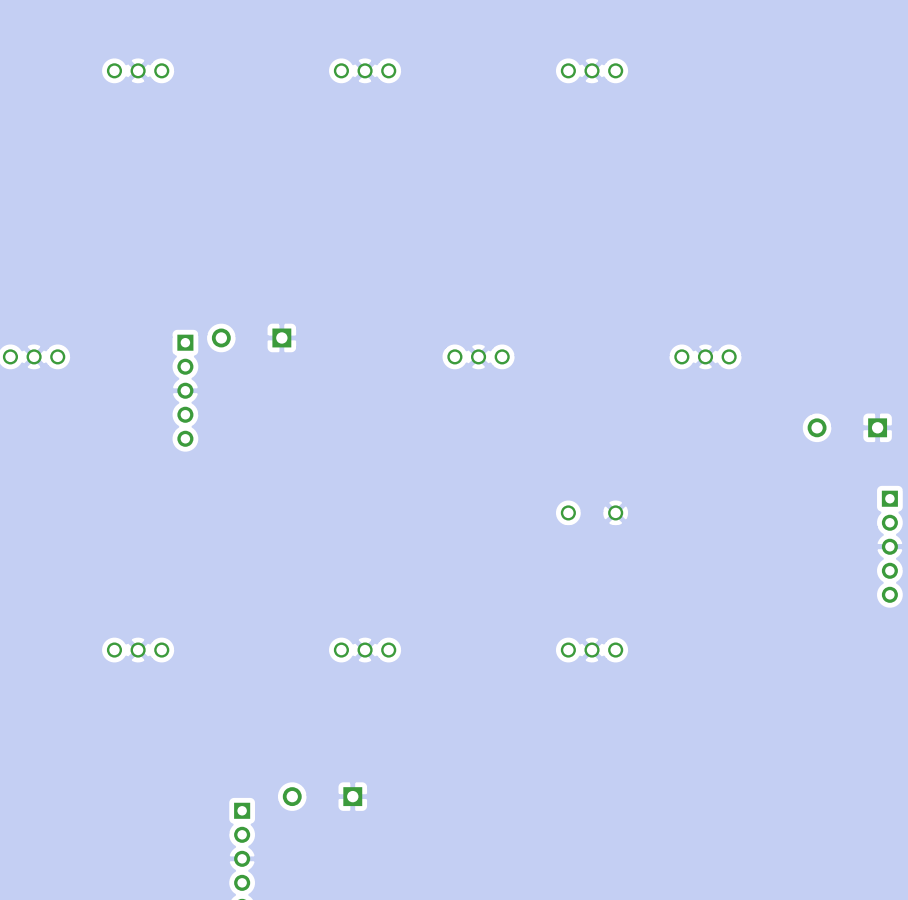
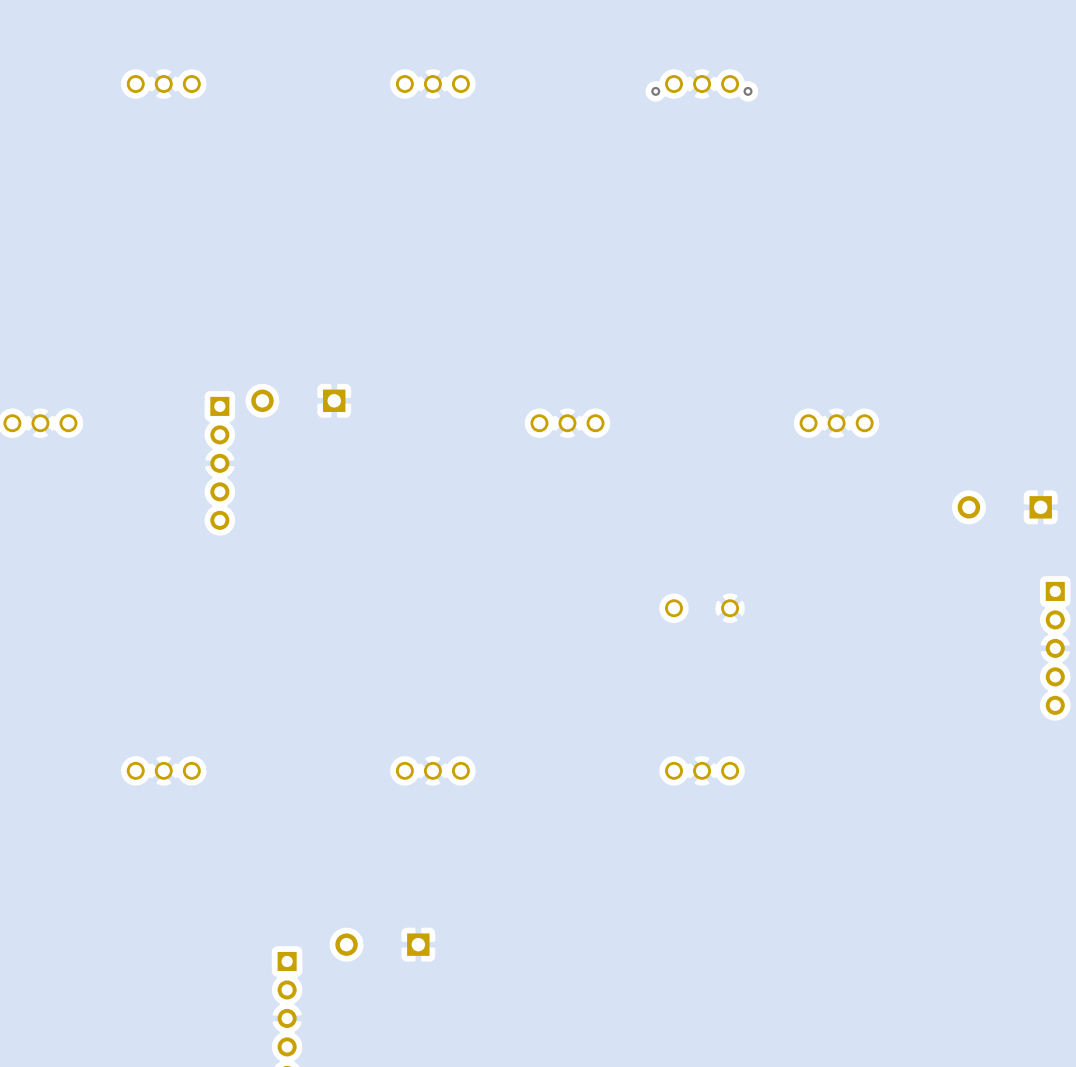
via: none -> (655, 91)
via: none -> (748, 91)

